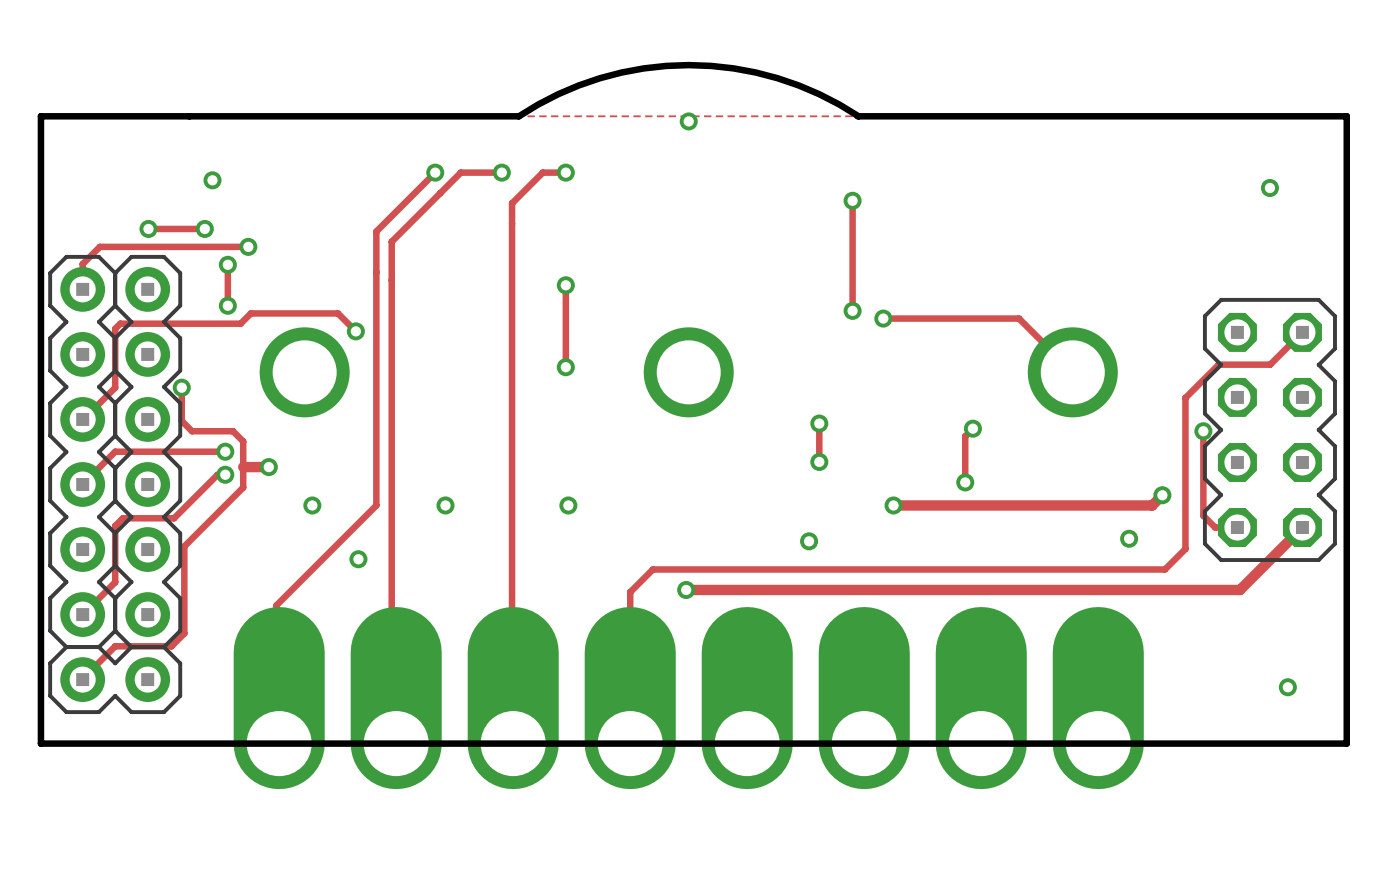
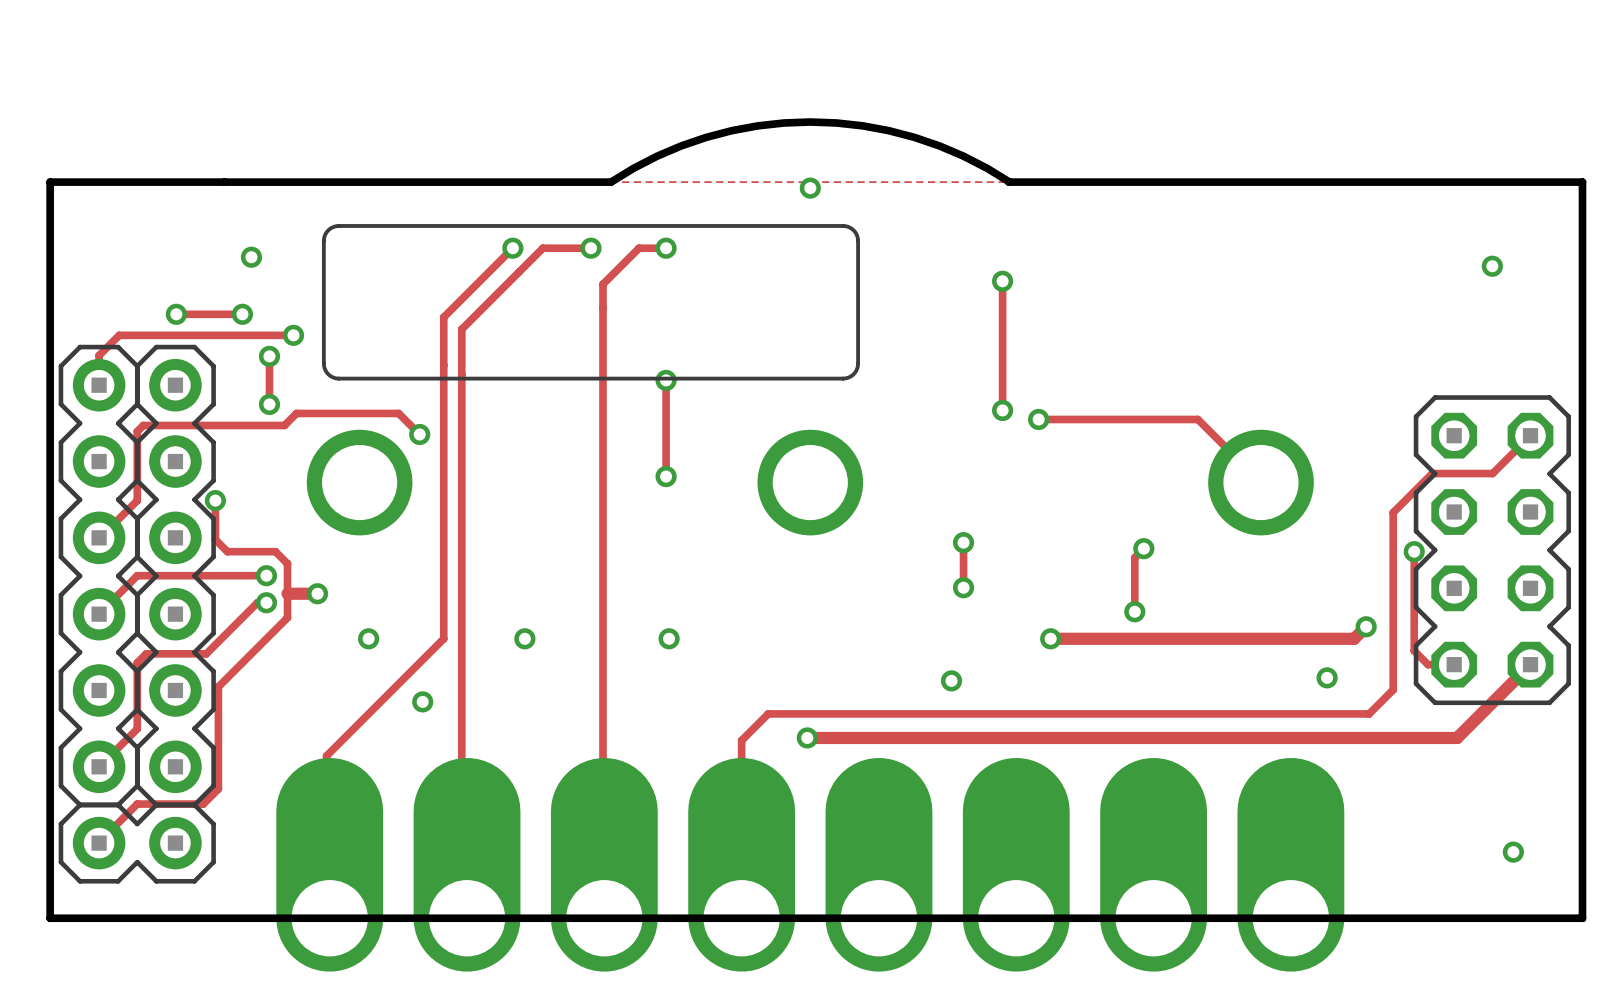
part: none -> (590, 302)

